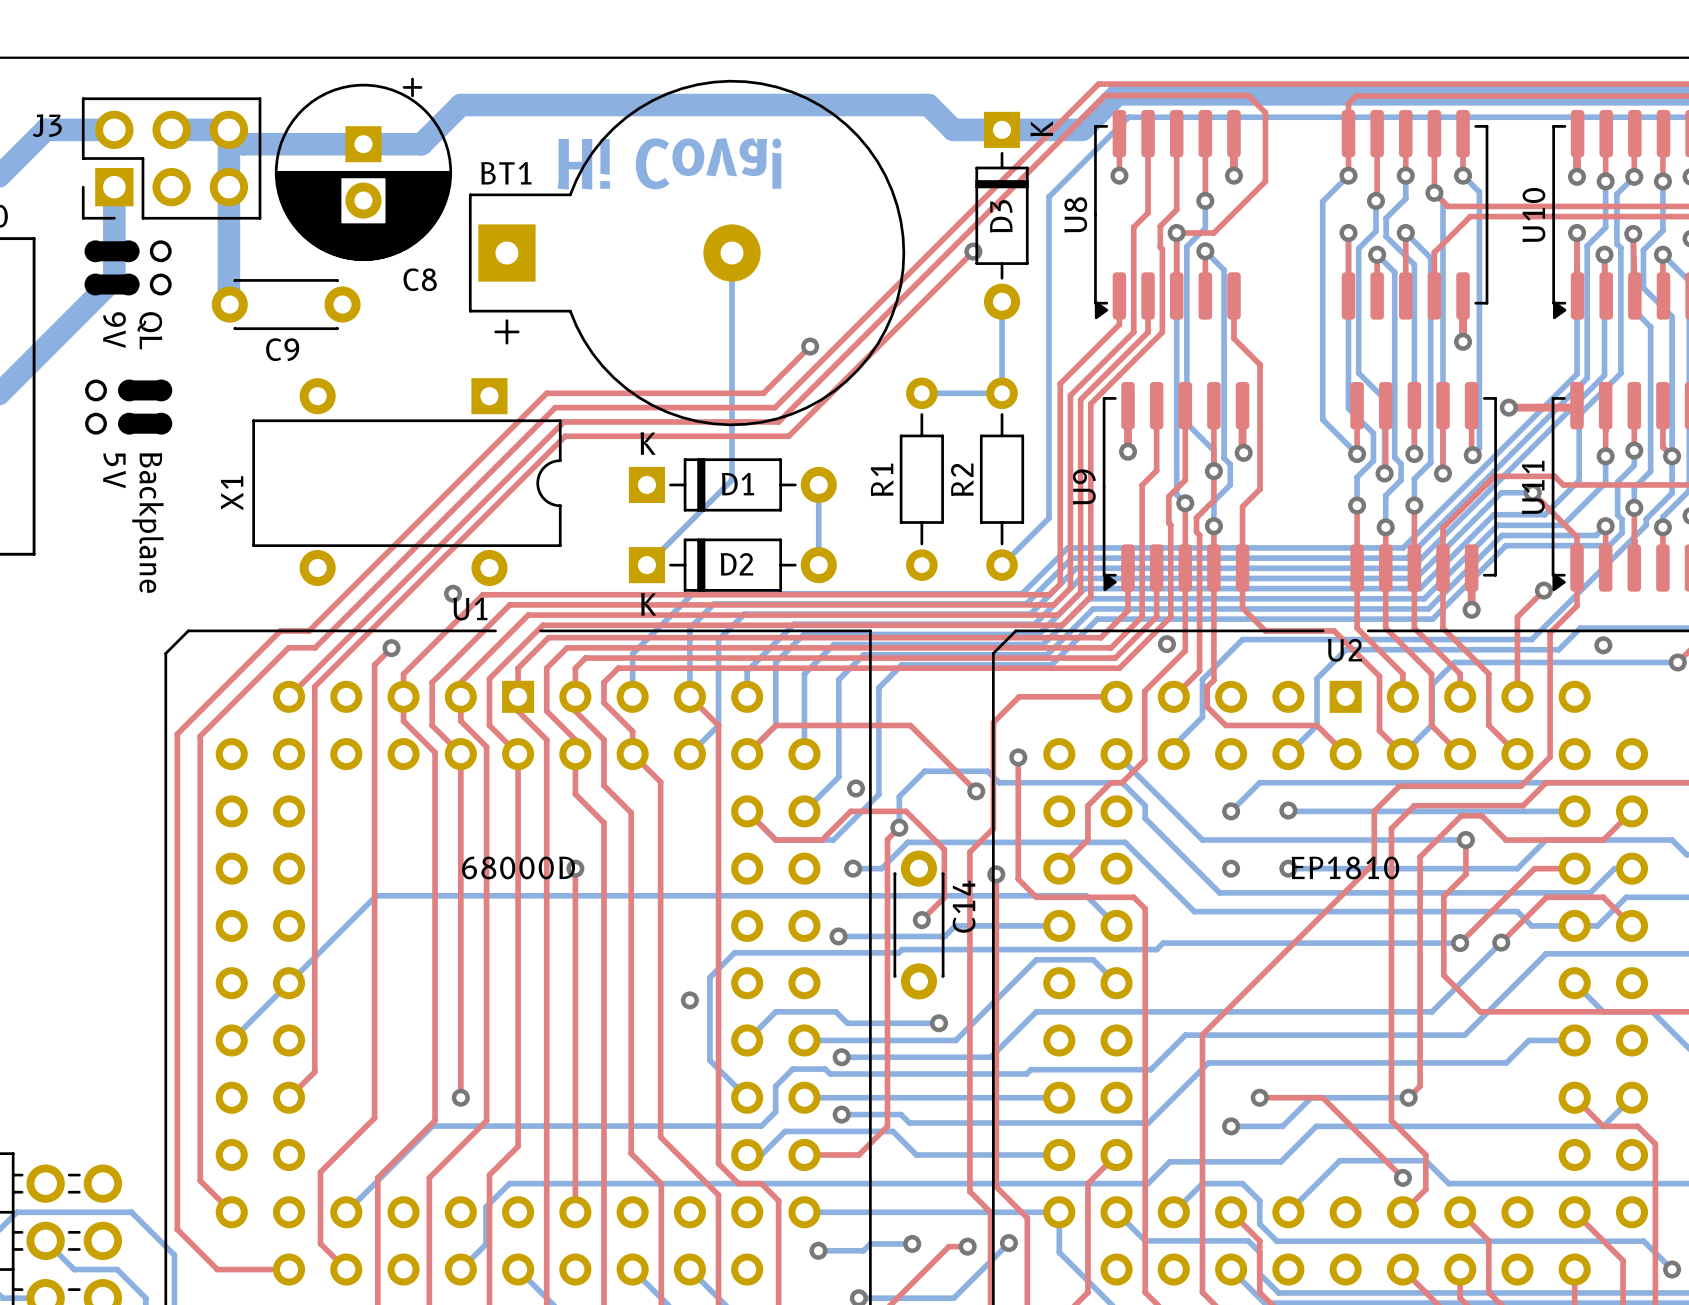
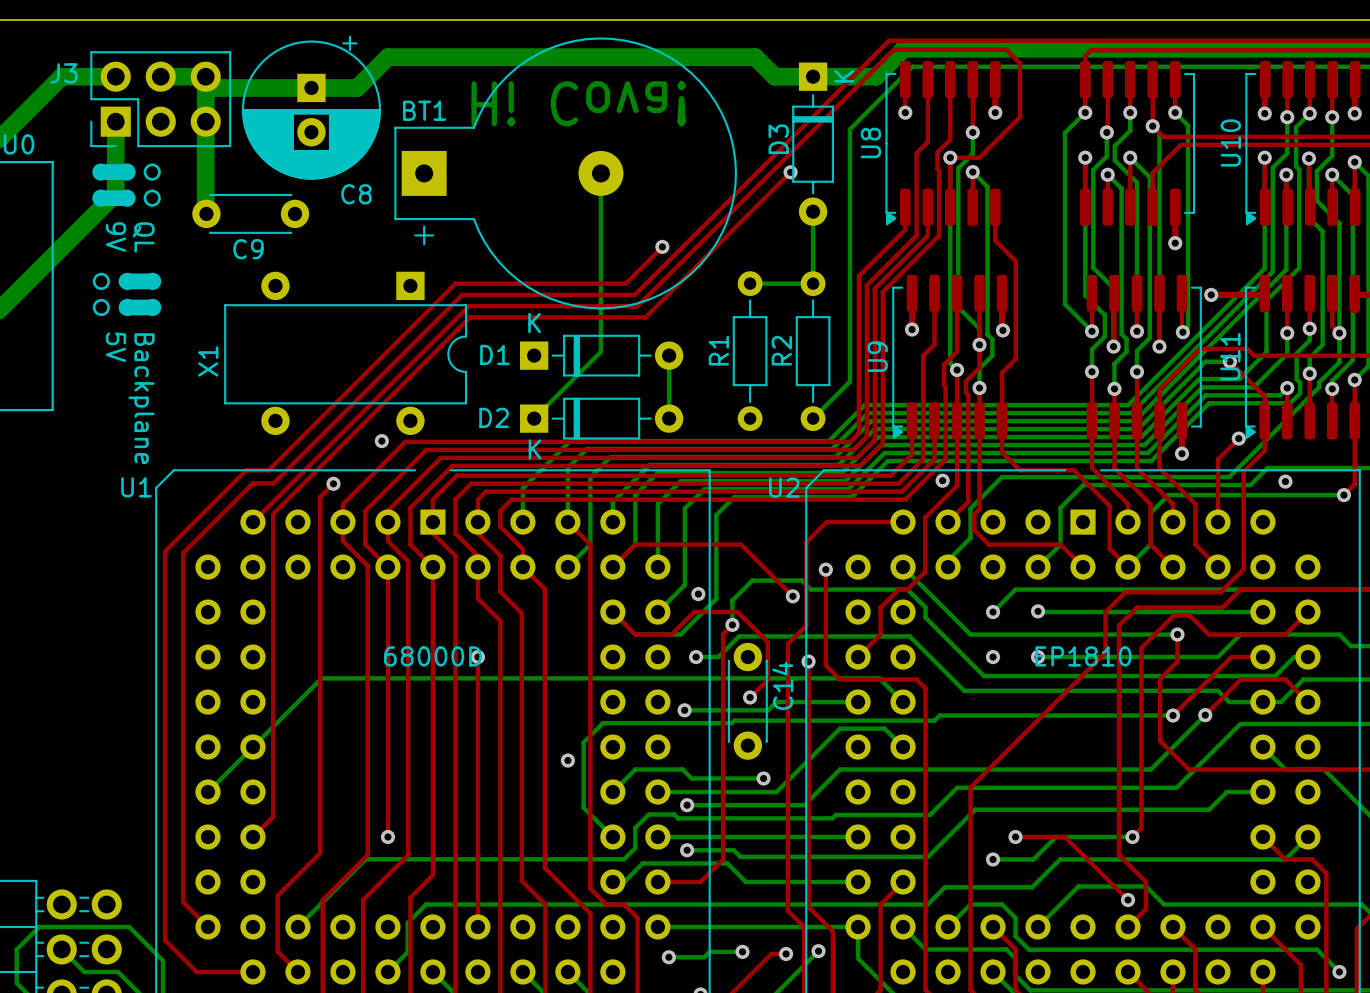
D3 name position: D3 (1001, 216) -> D3 (778, 139)
D1 name position: D1 (737, 484) -> D1 (494, 354)
D2 name position: D2 (736, 564) -> D2 (494, 417)
U1 name position: U1 (470, 609) -> U1 (136, 487)
U2 name position: U2 (1344, 650) -> U2 (784, 487)

